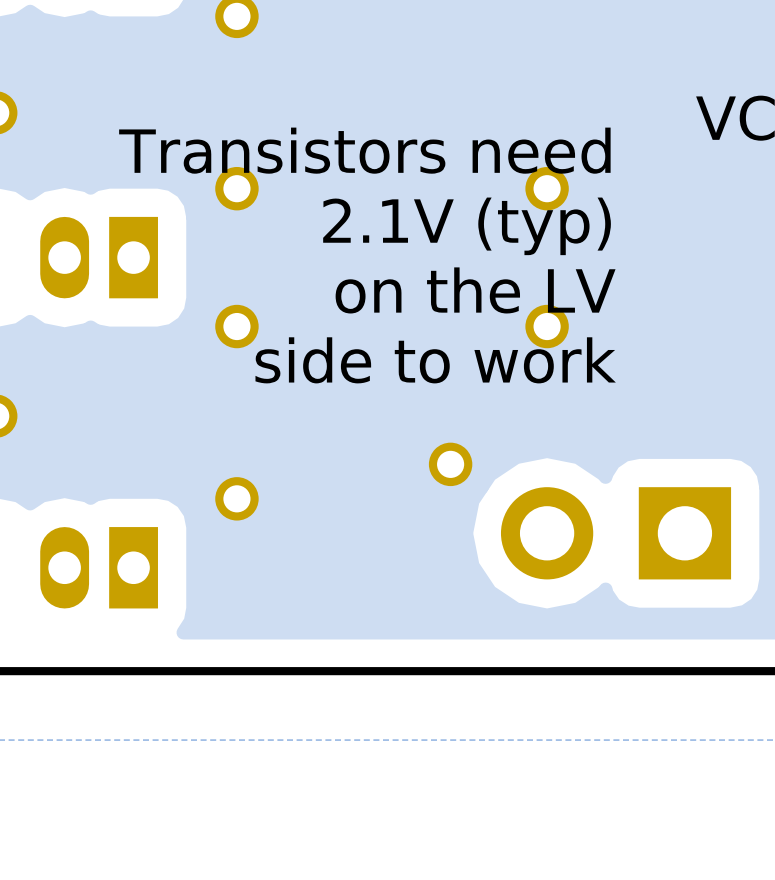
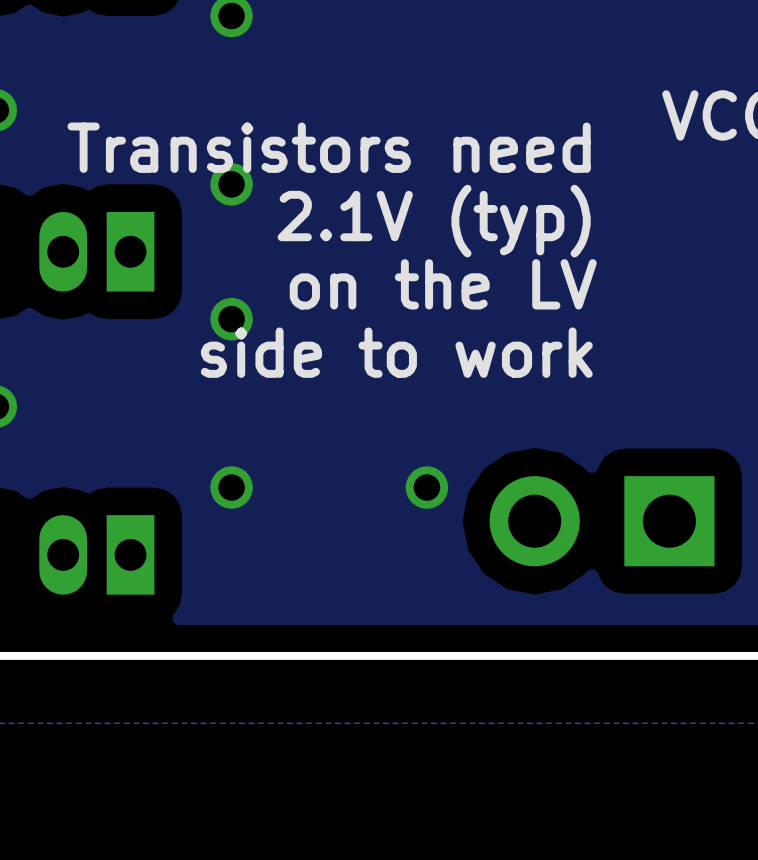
part: (547, 188) -> none
part: (547, 326) -> none
part position: (450, 464) -> (426, 487)

